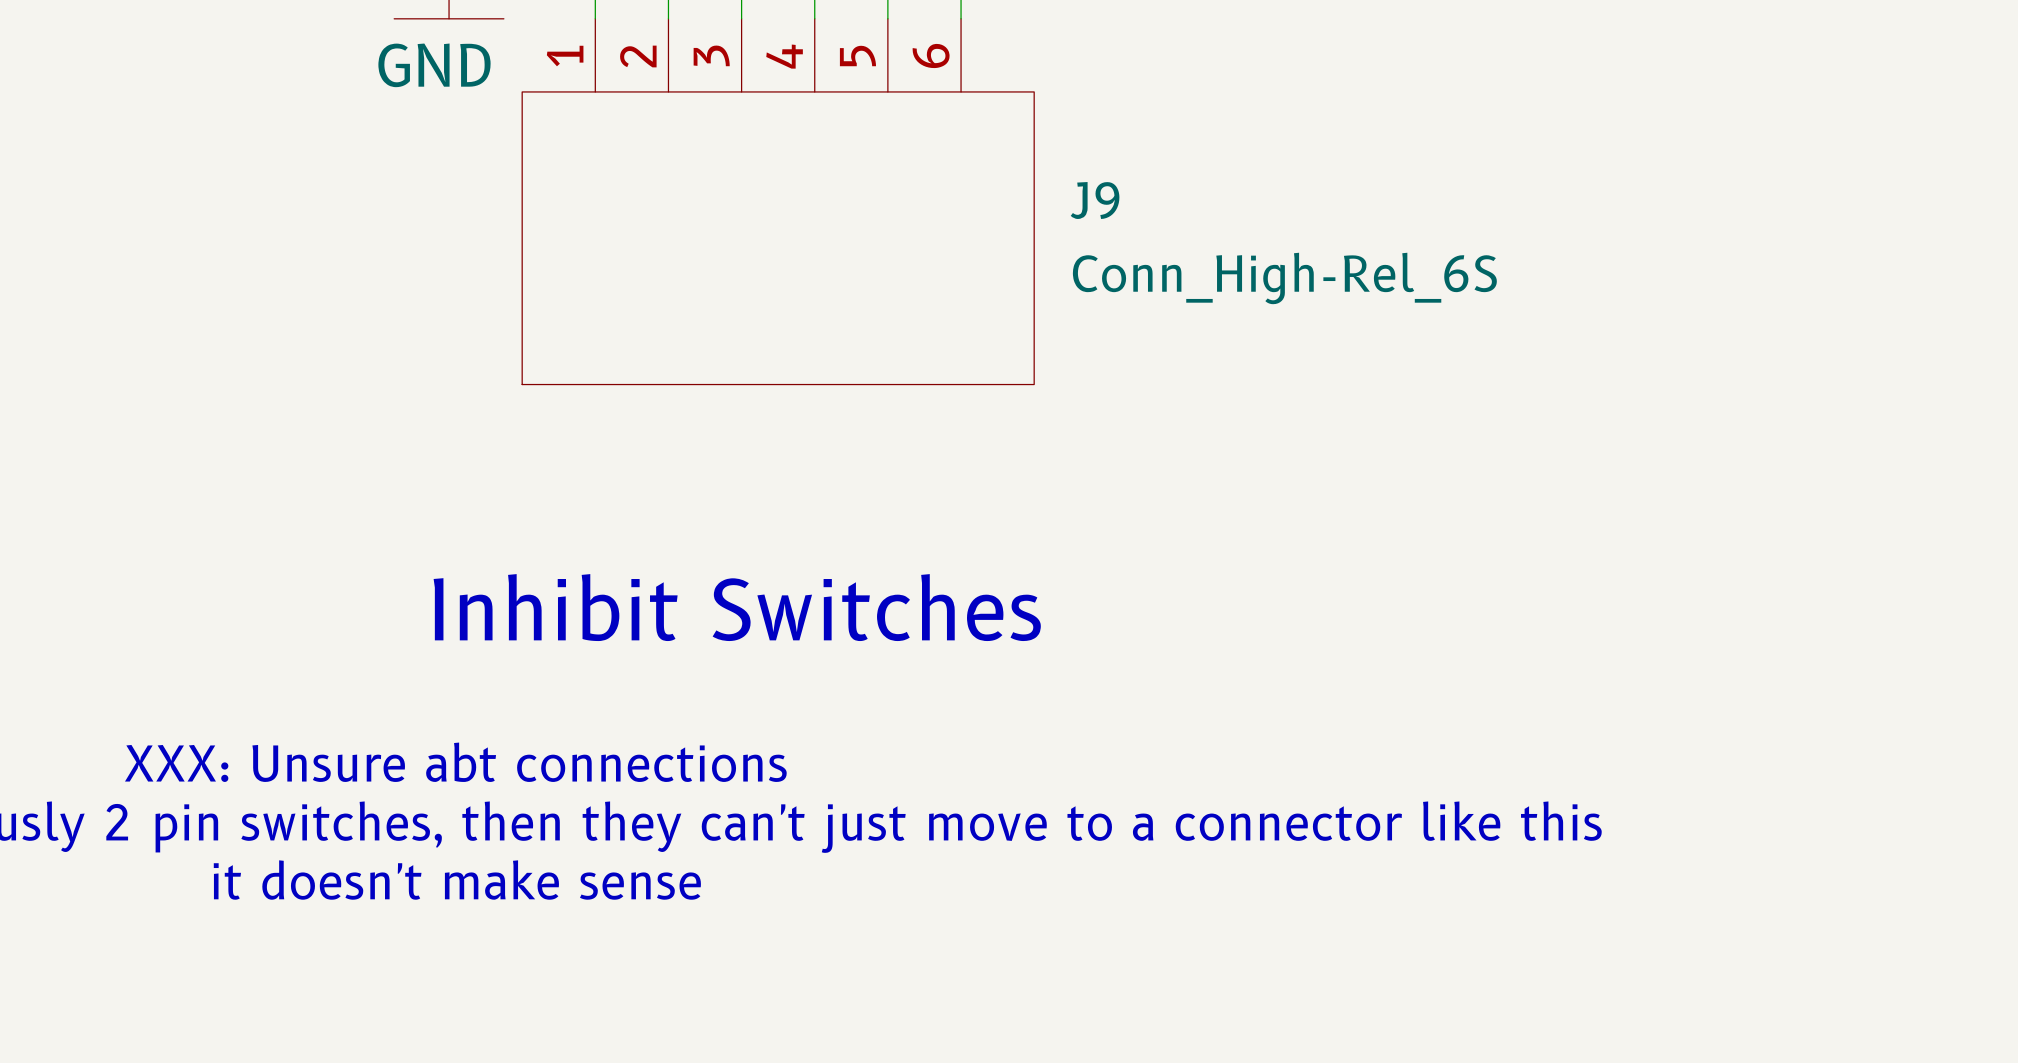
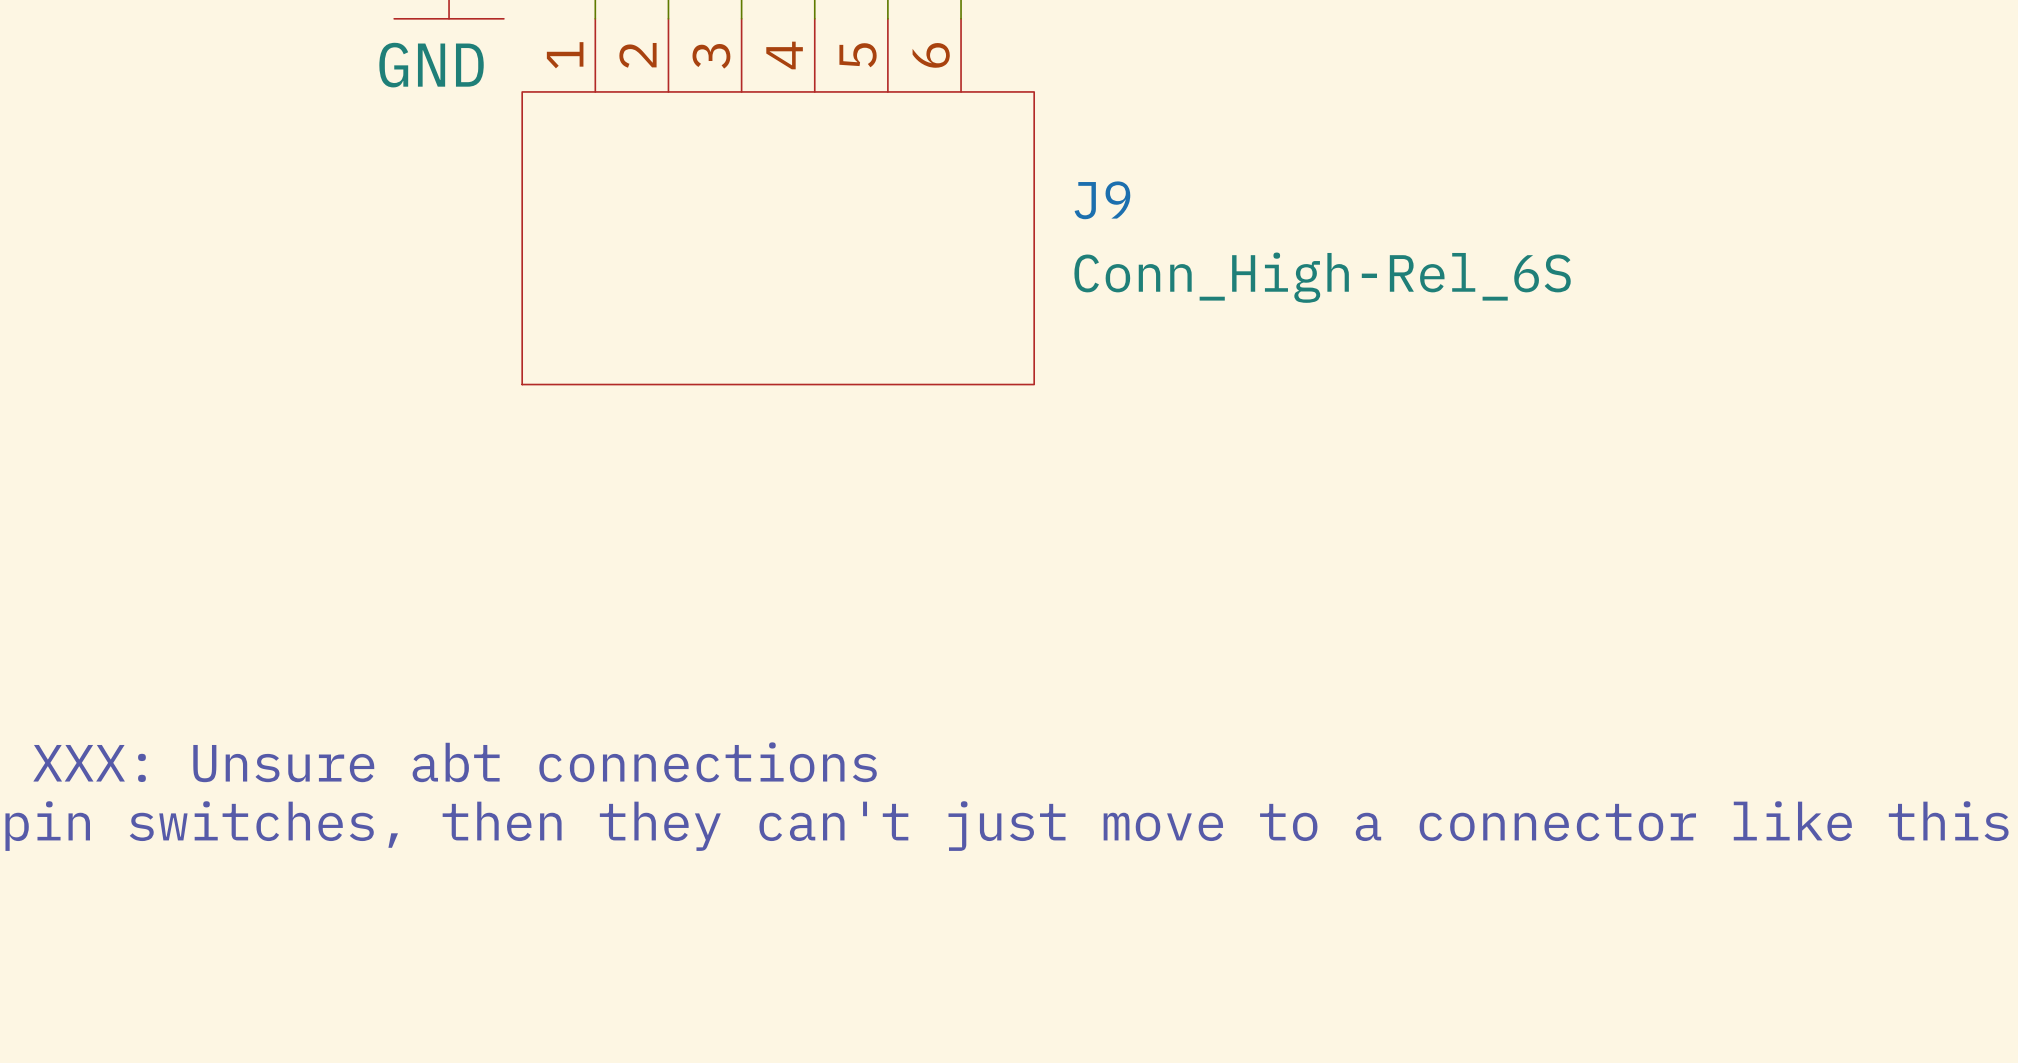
text: Inhibit Switches (737, 607) -> none
text: it doesn't make sense (457, 880) -> none

